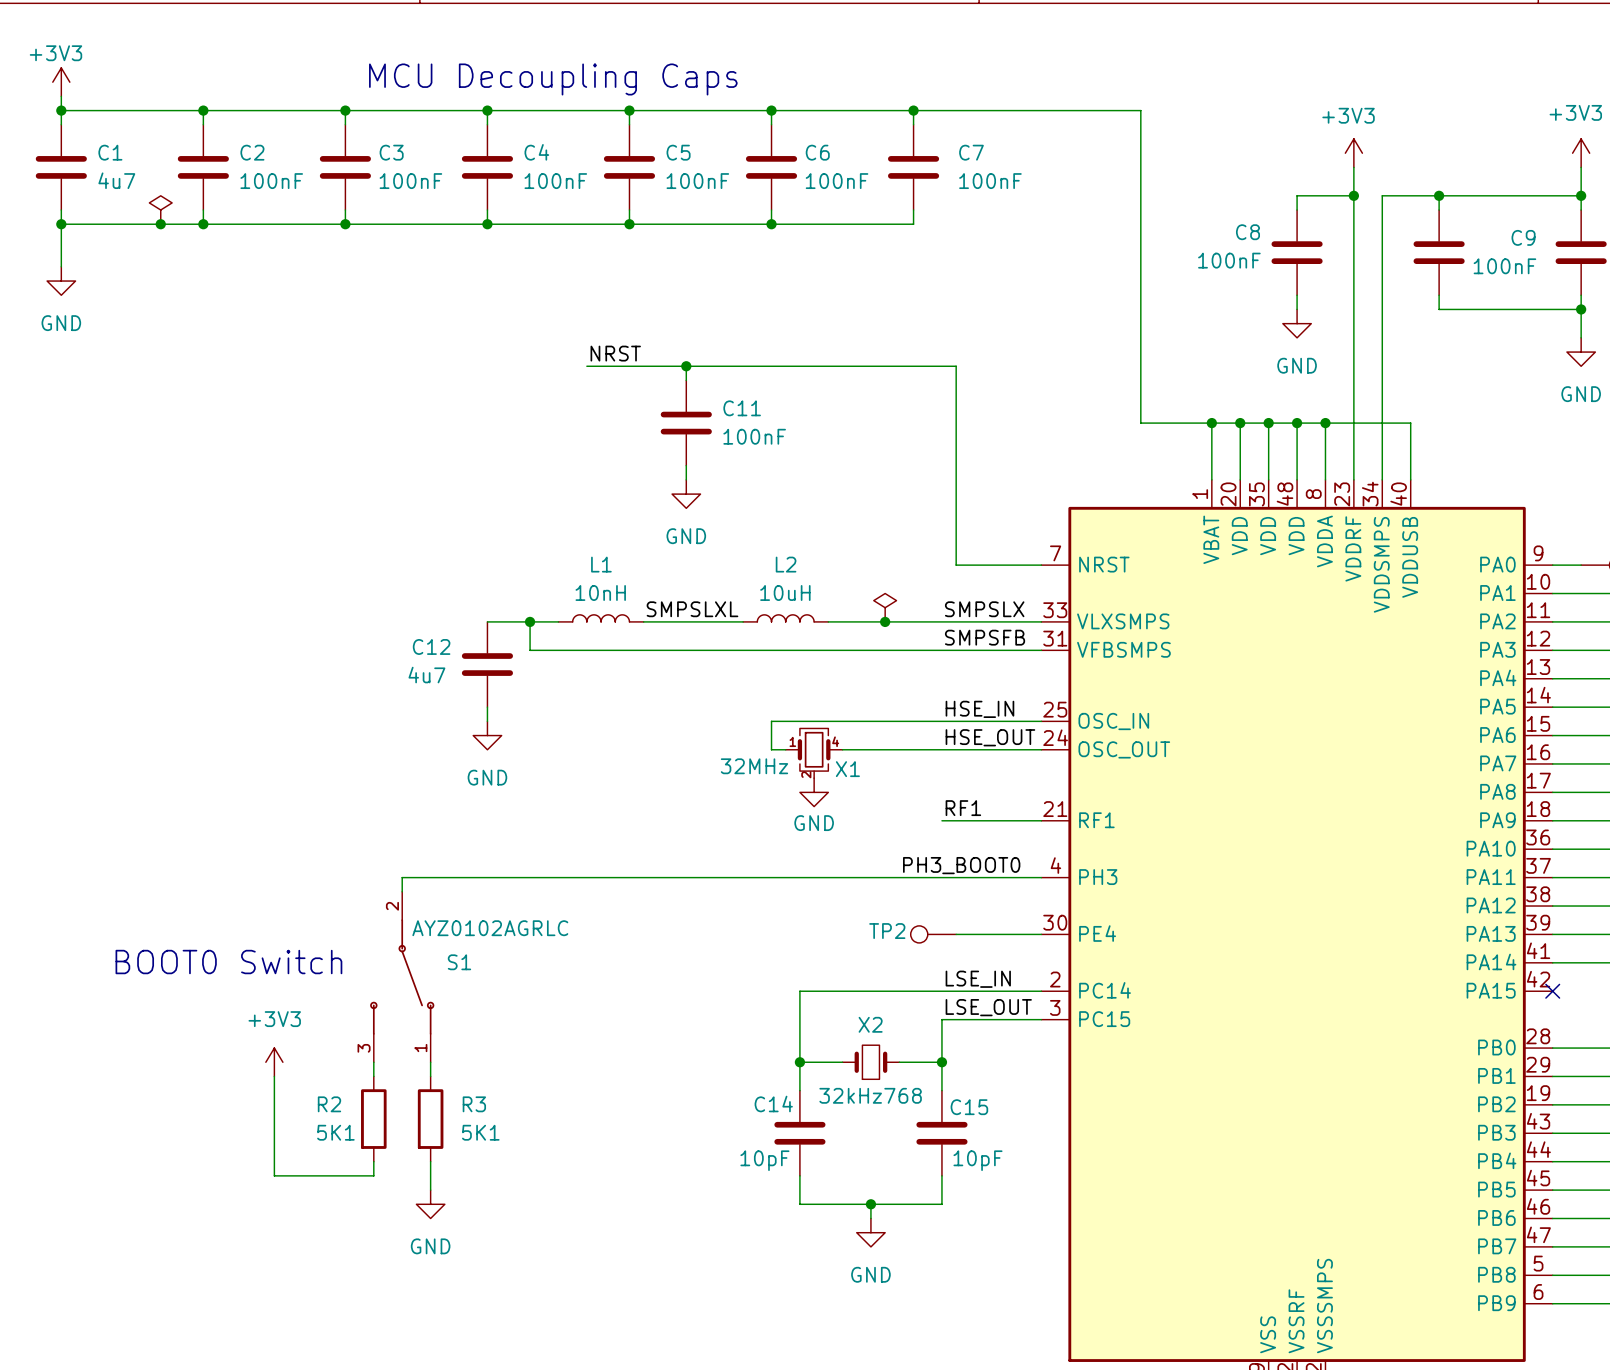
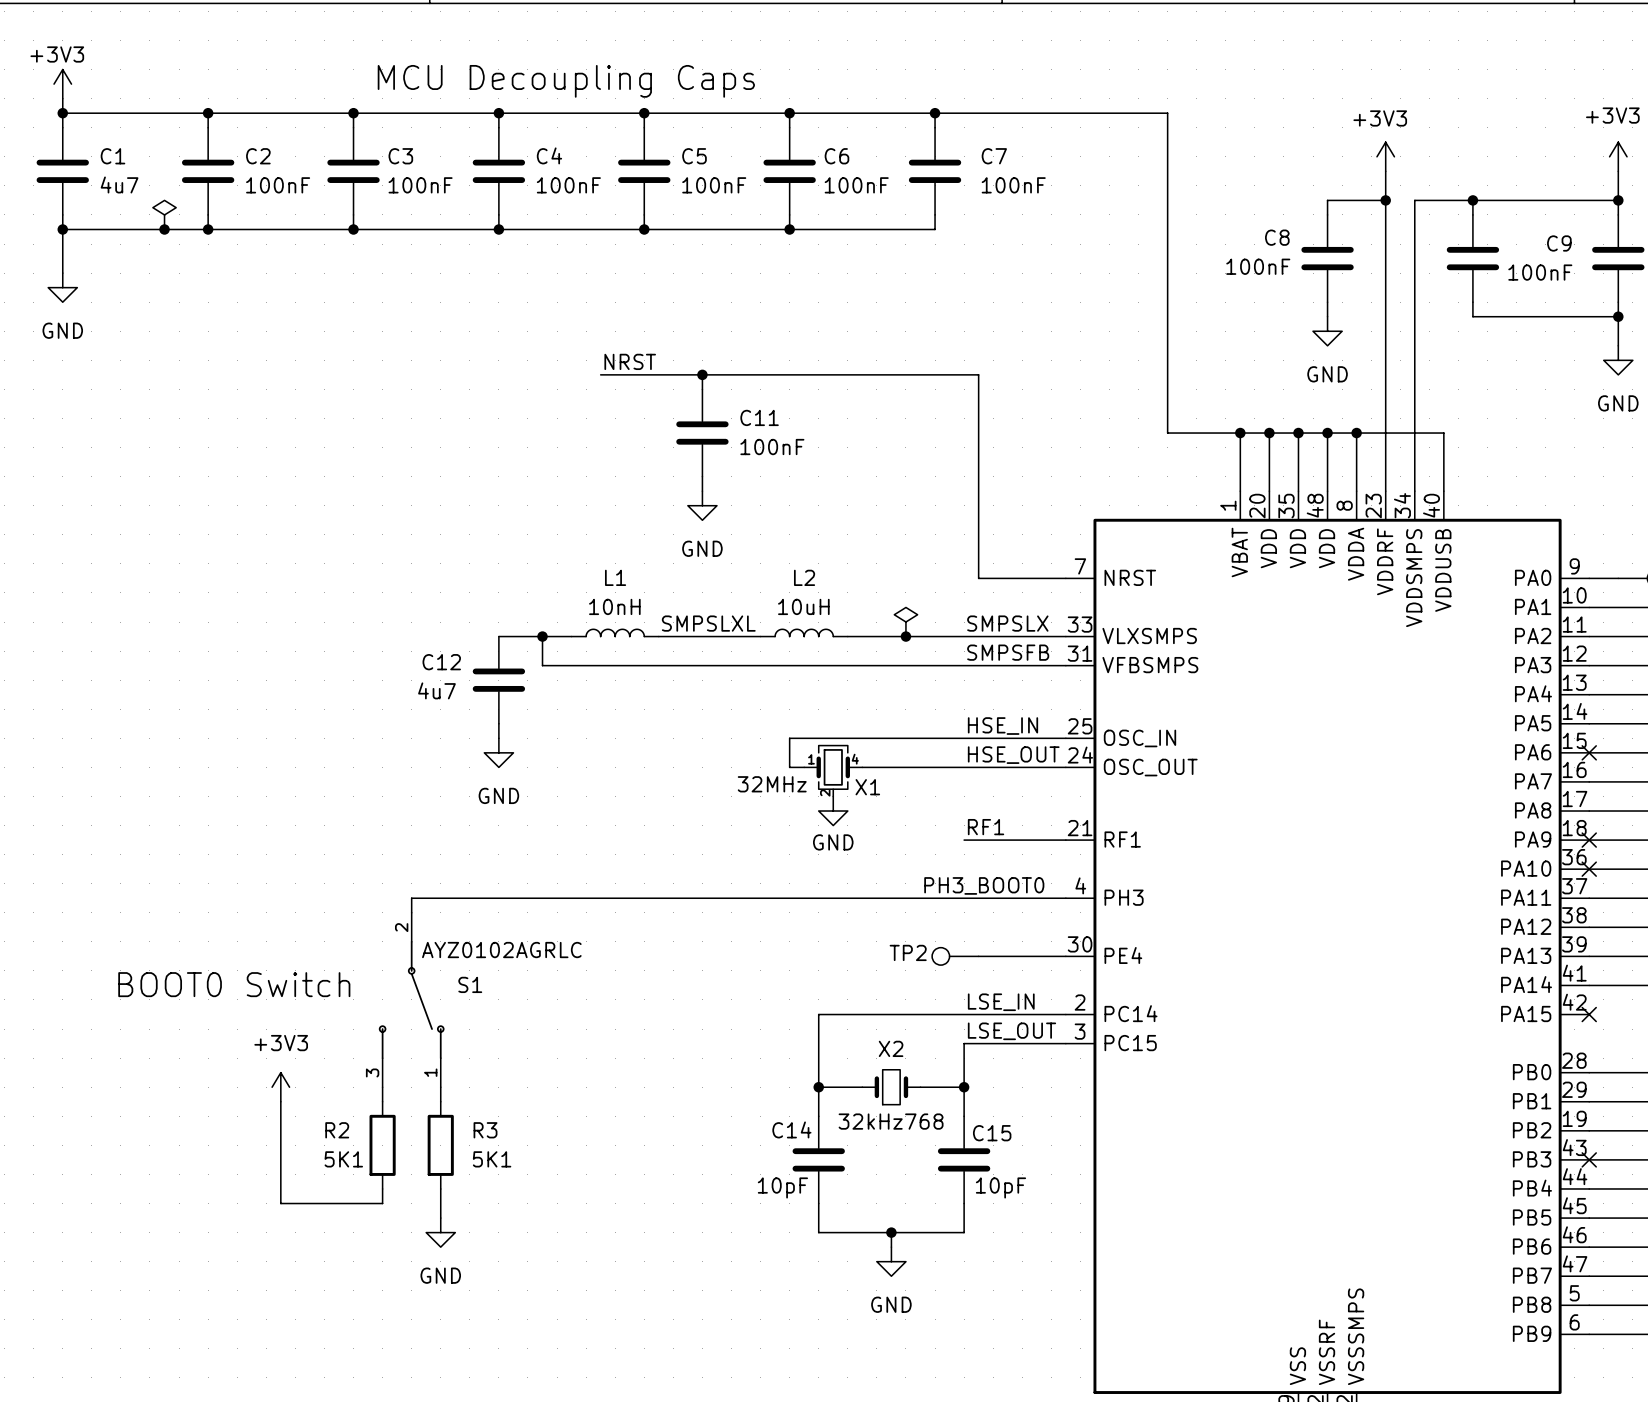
no-connect mark: none -> (1589, 752)
no-connect mark: none -> (1589, 840)
no-connect mark: none -> (1589, 869)
no-connect mark: none -> (1589, 1159)

